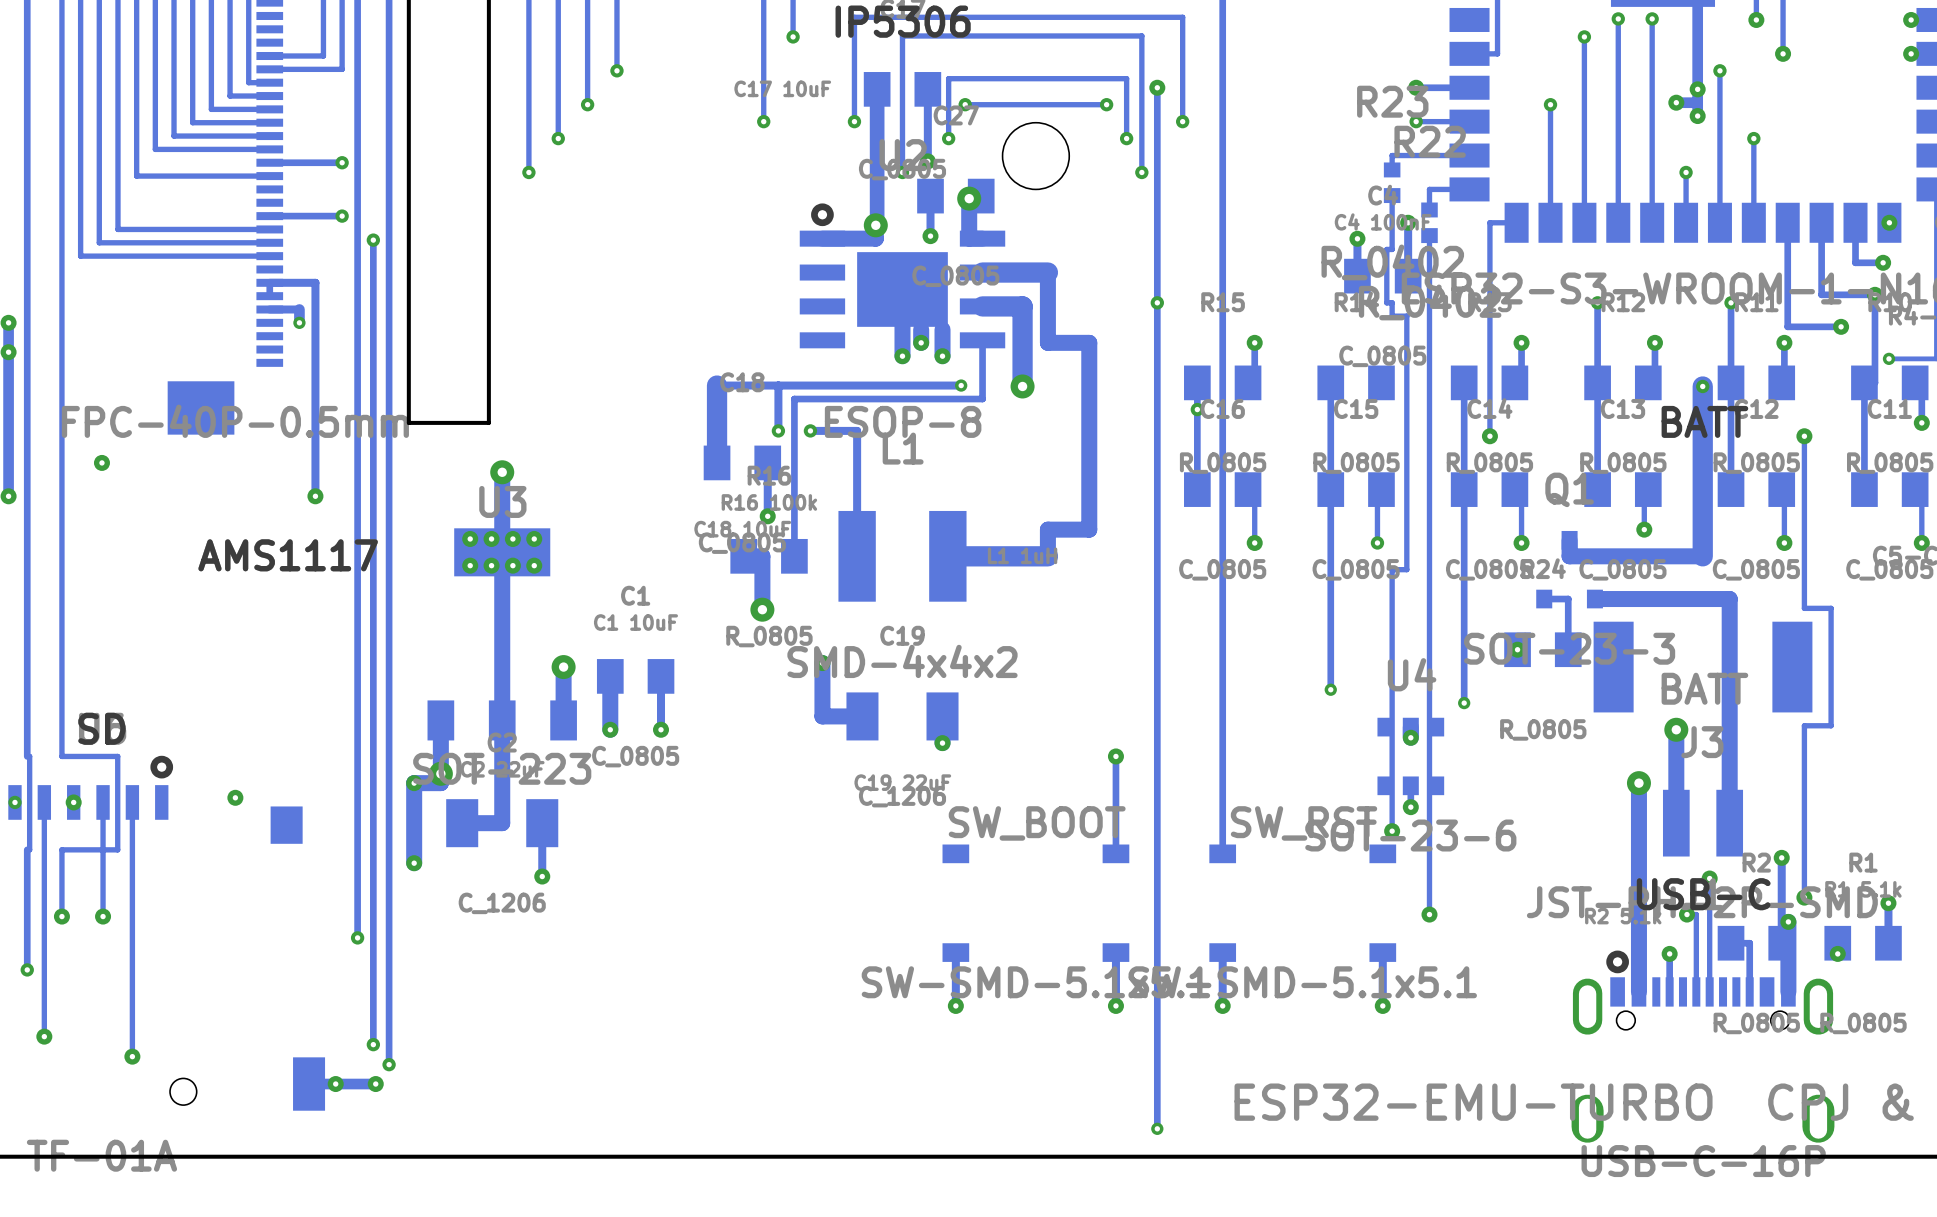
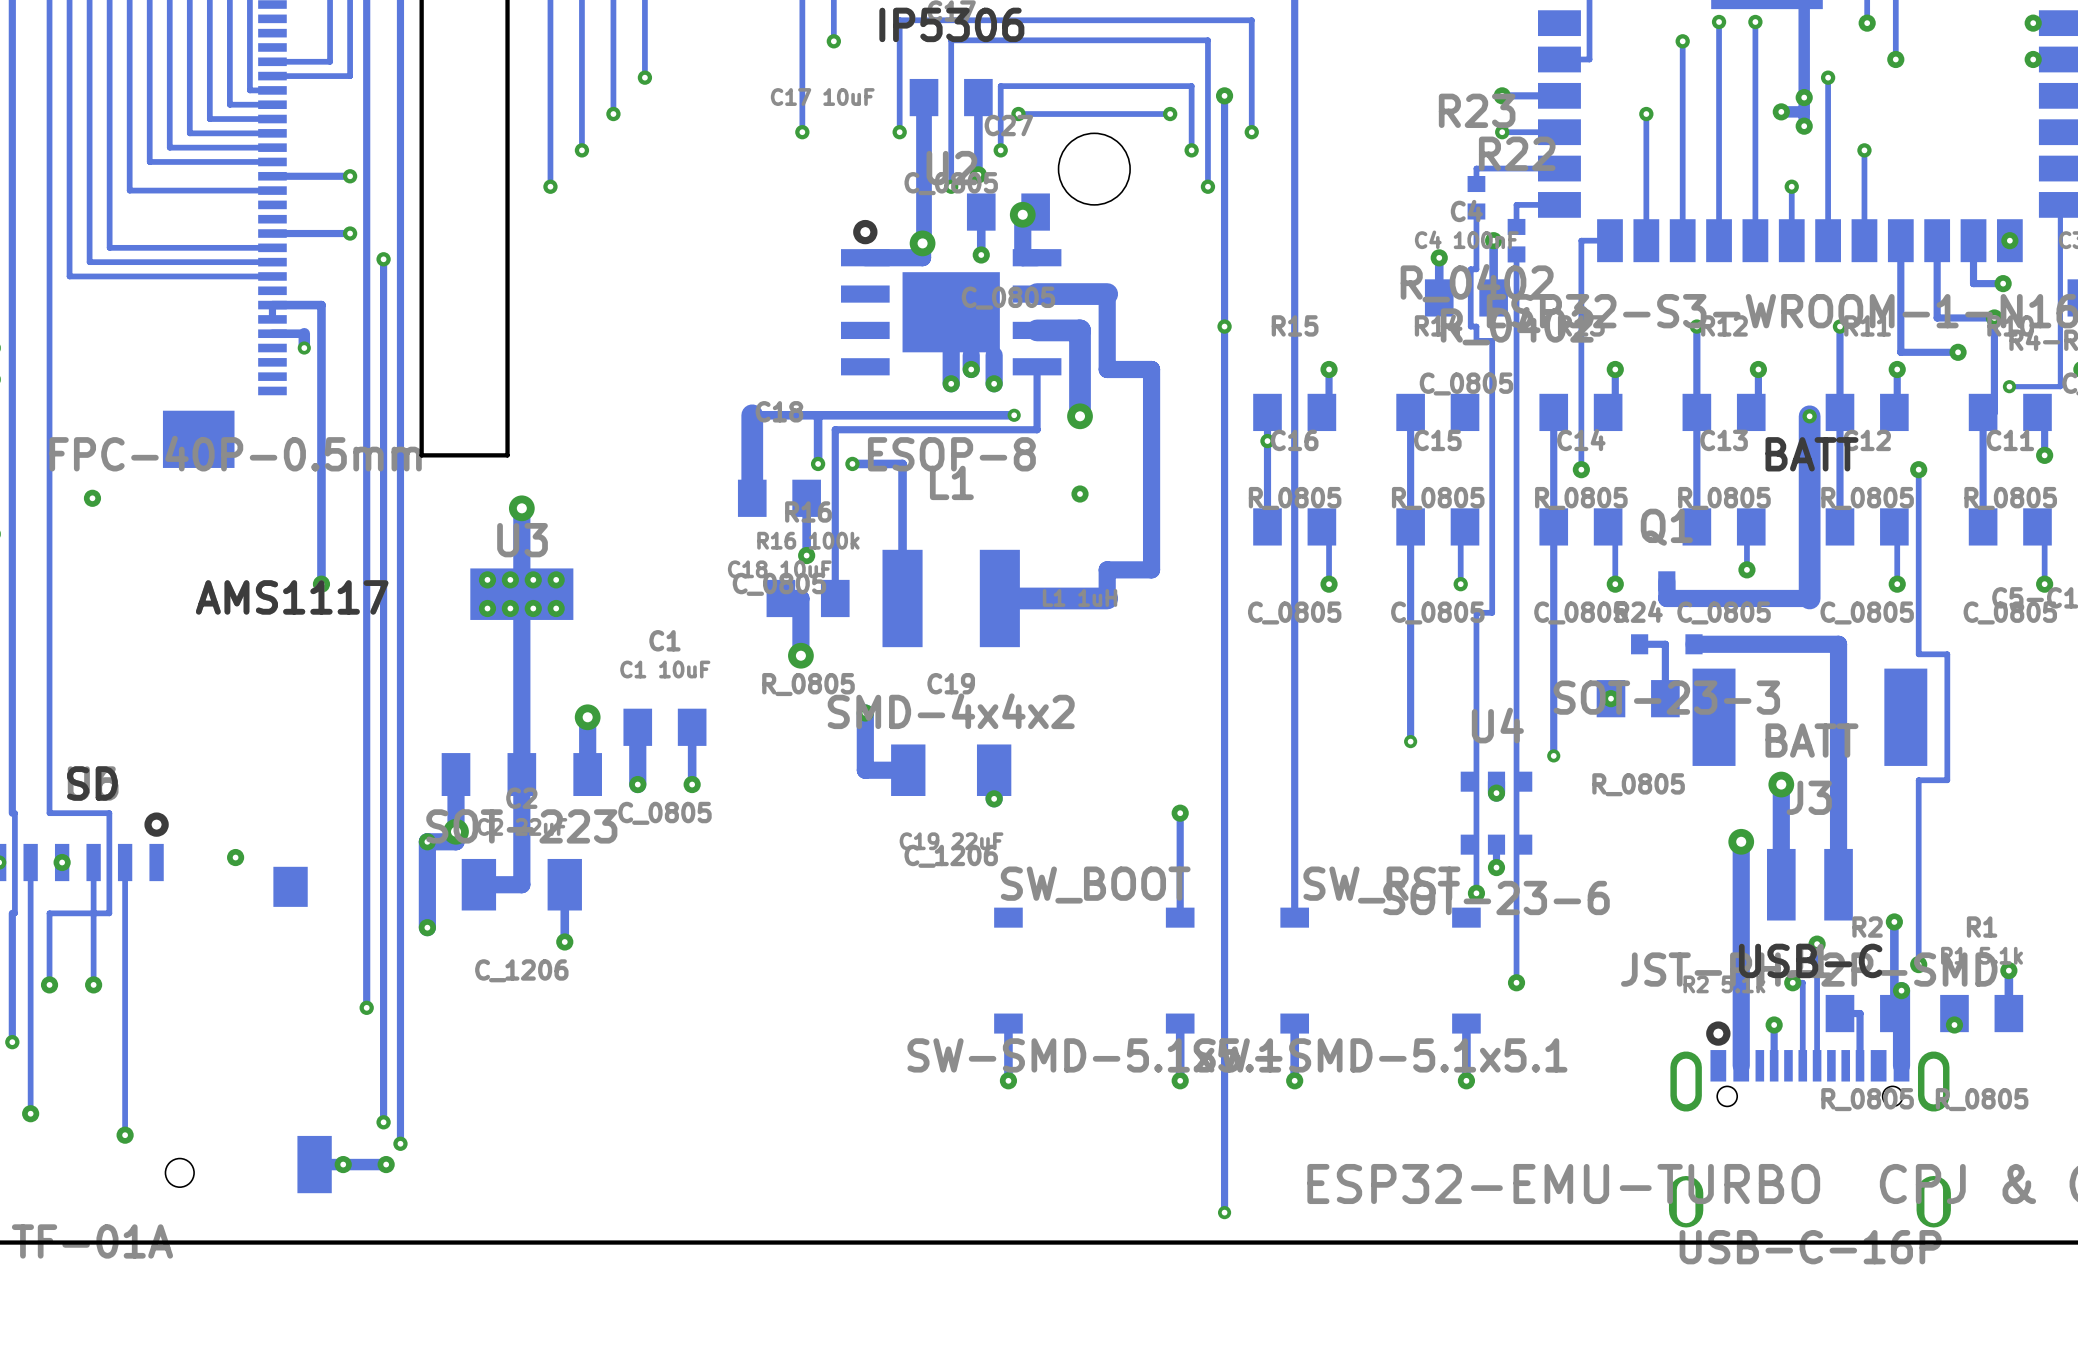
via: none -> (1080, 494)
track: none -> (321, 534) (321, 584)
via position: (315, 496) -> (321, 584)

